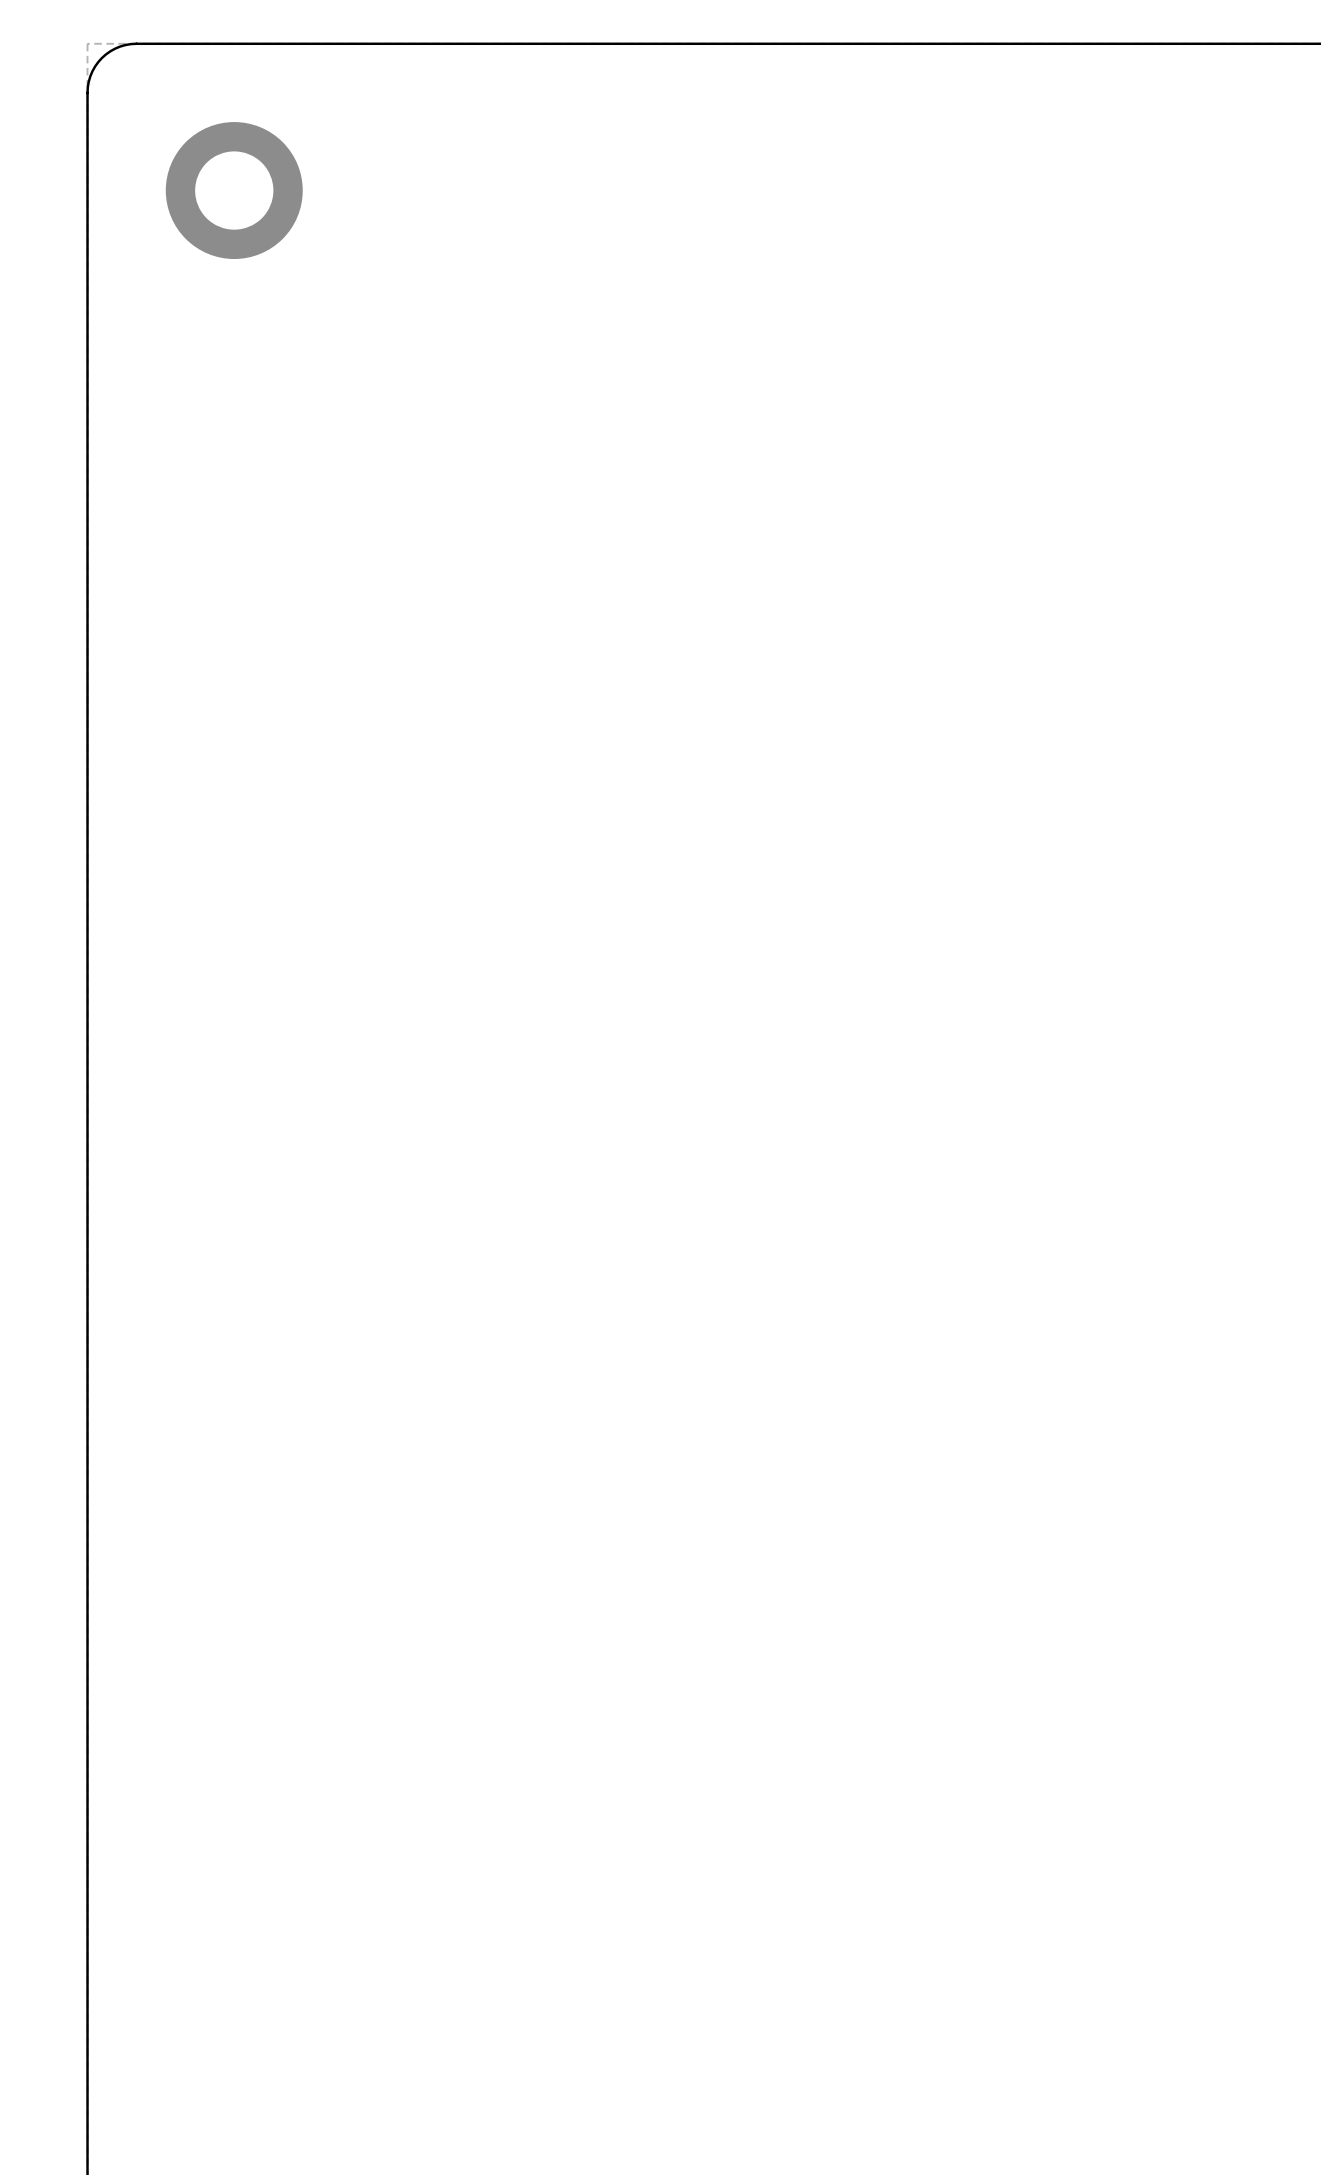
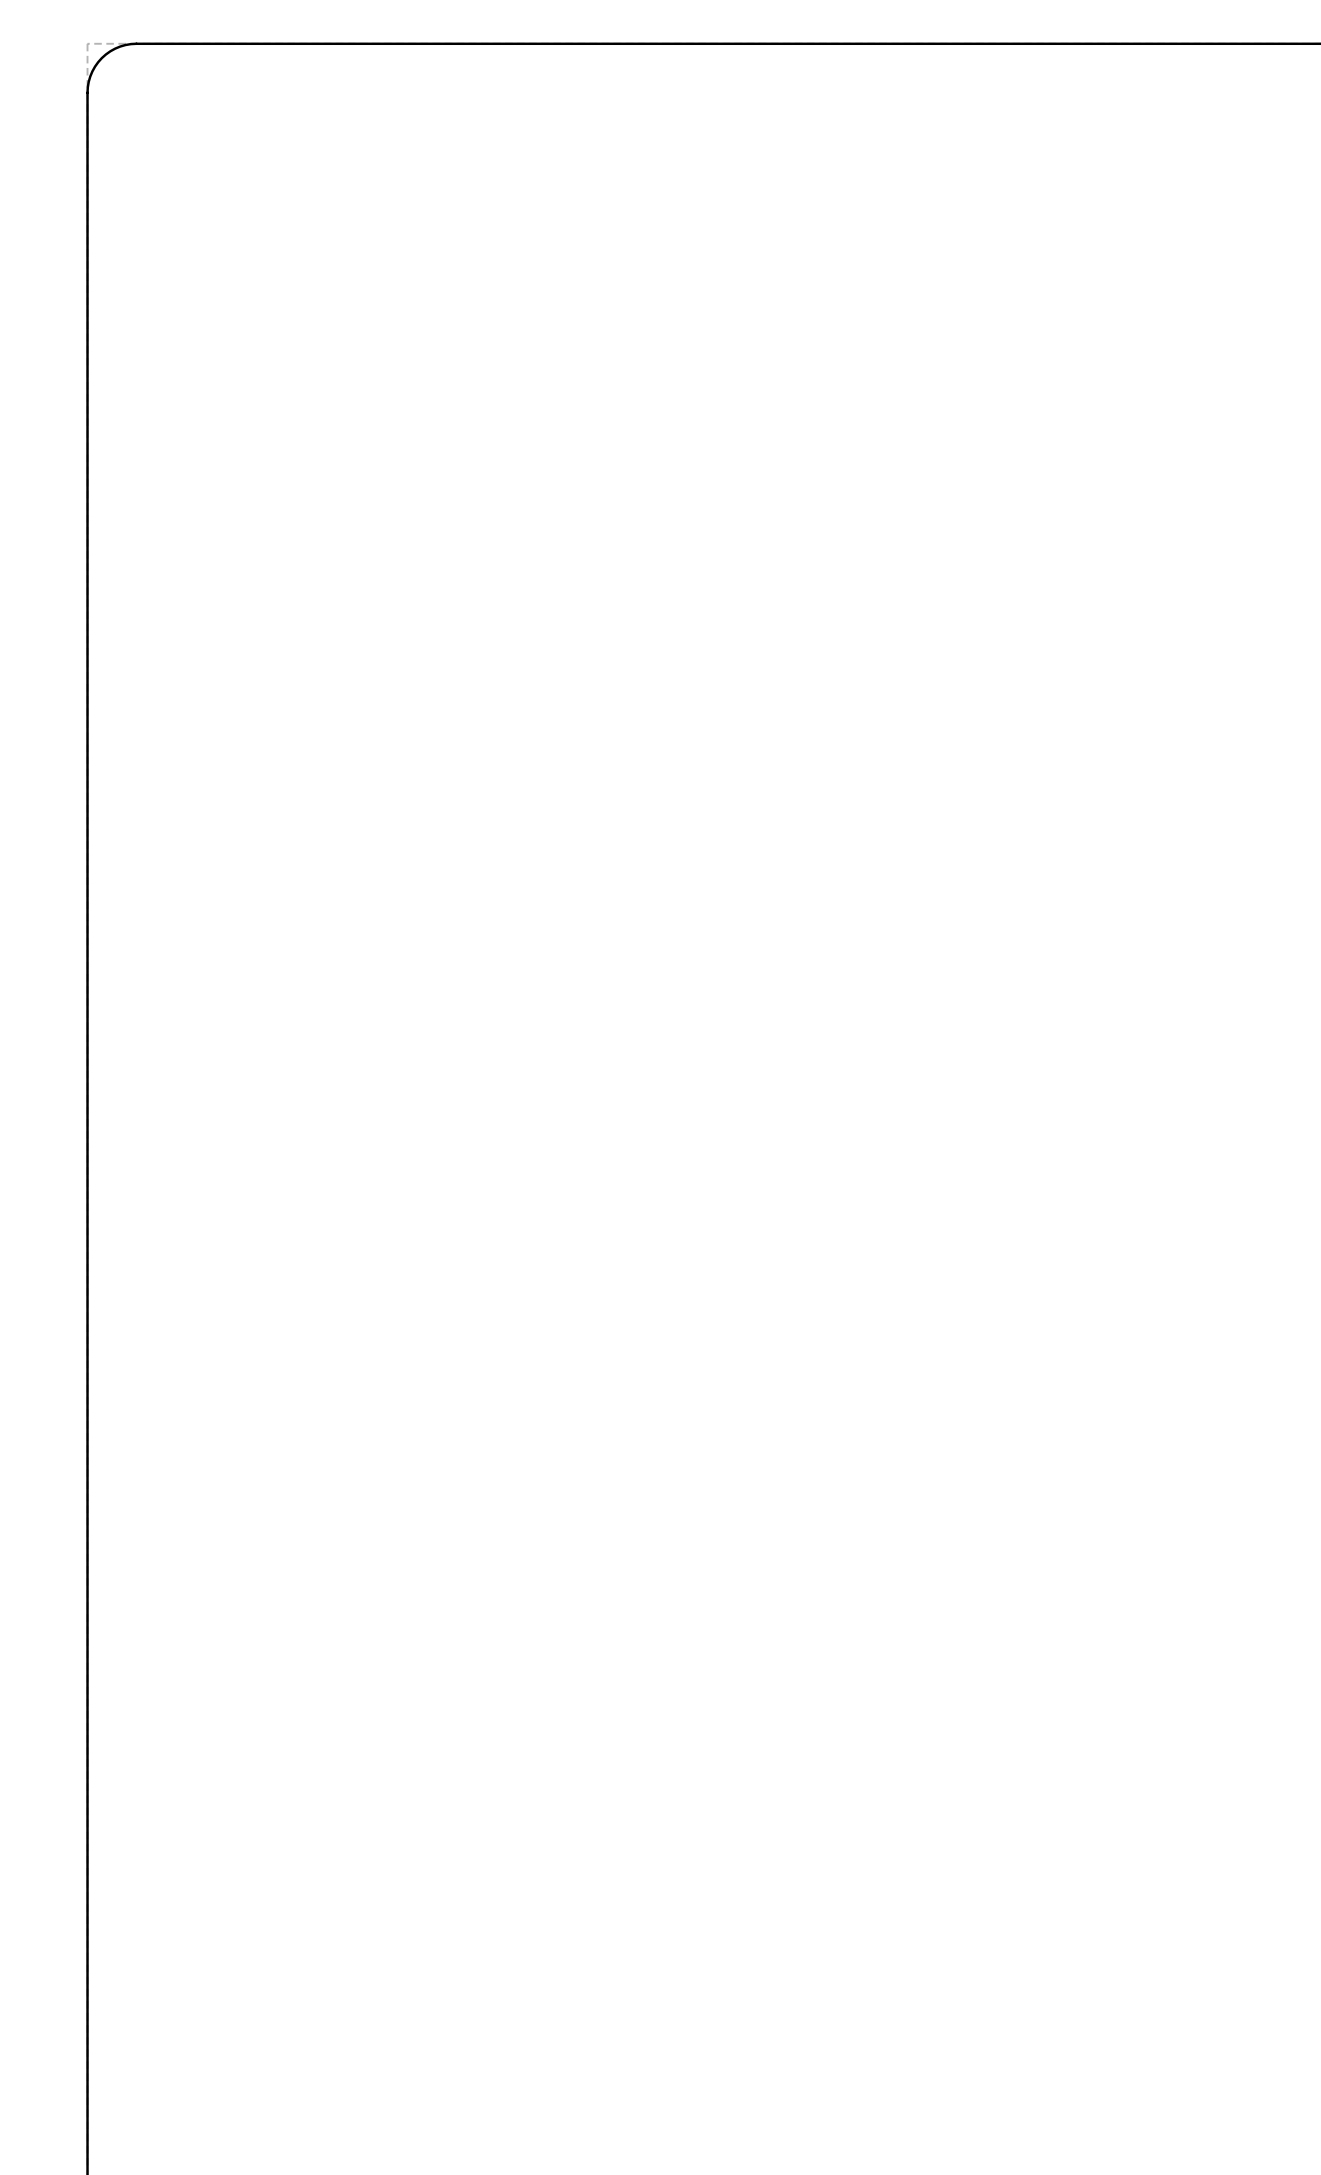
part: (234, 190) -> none

